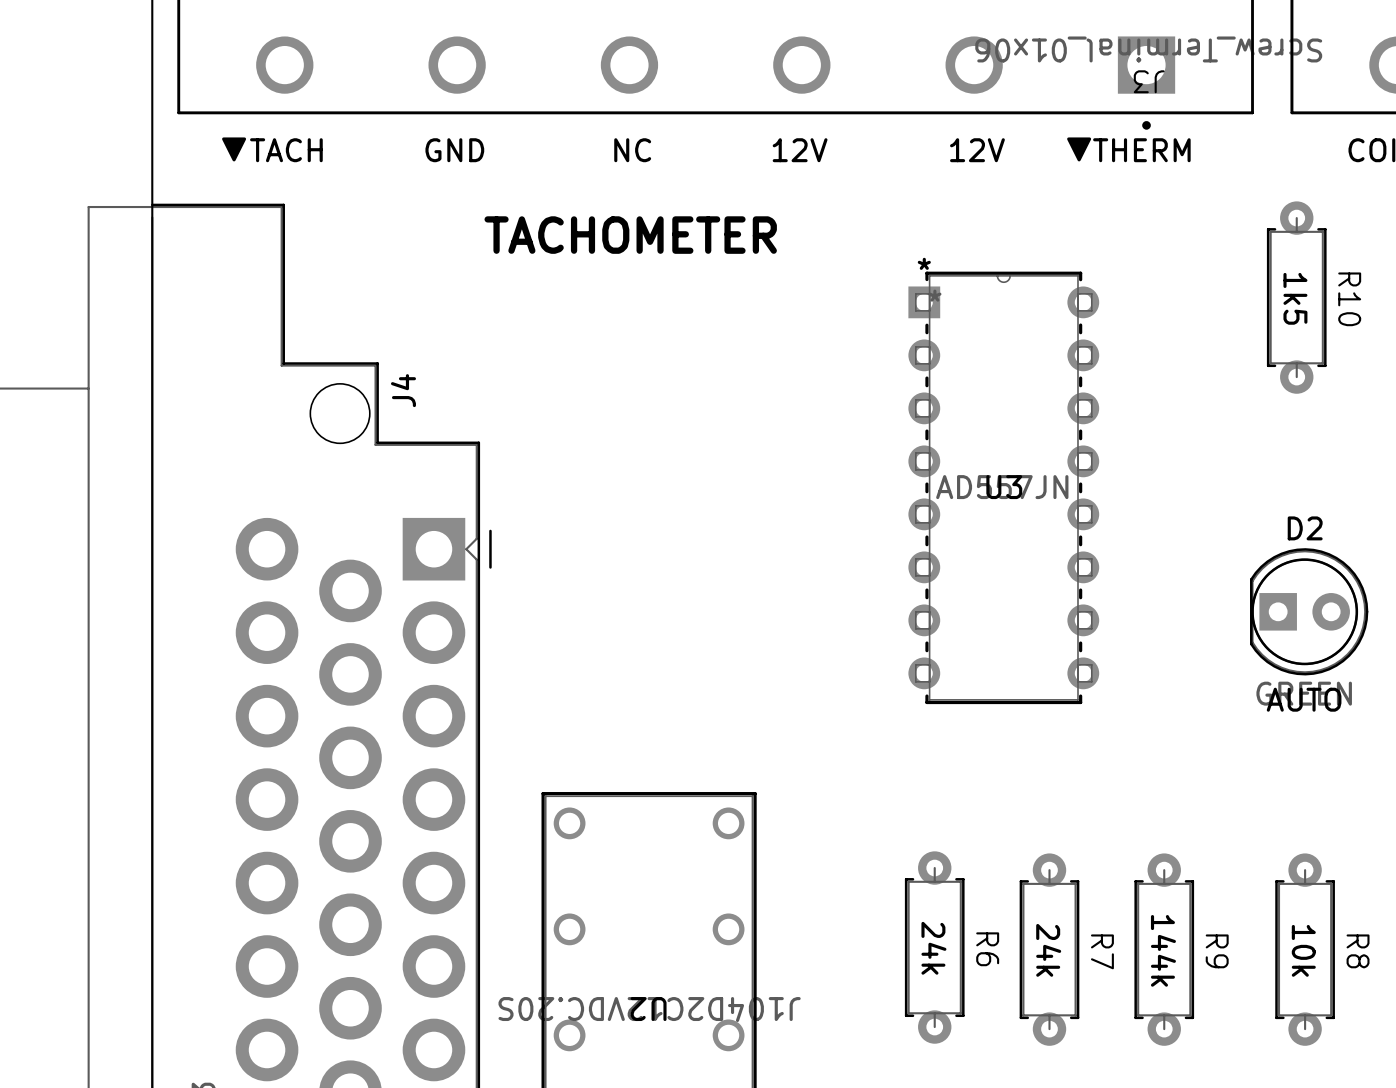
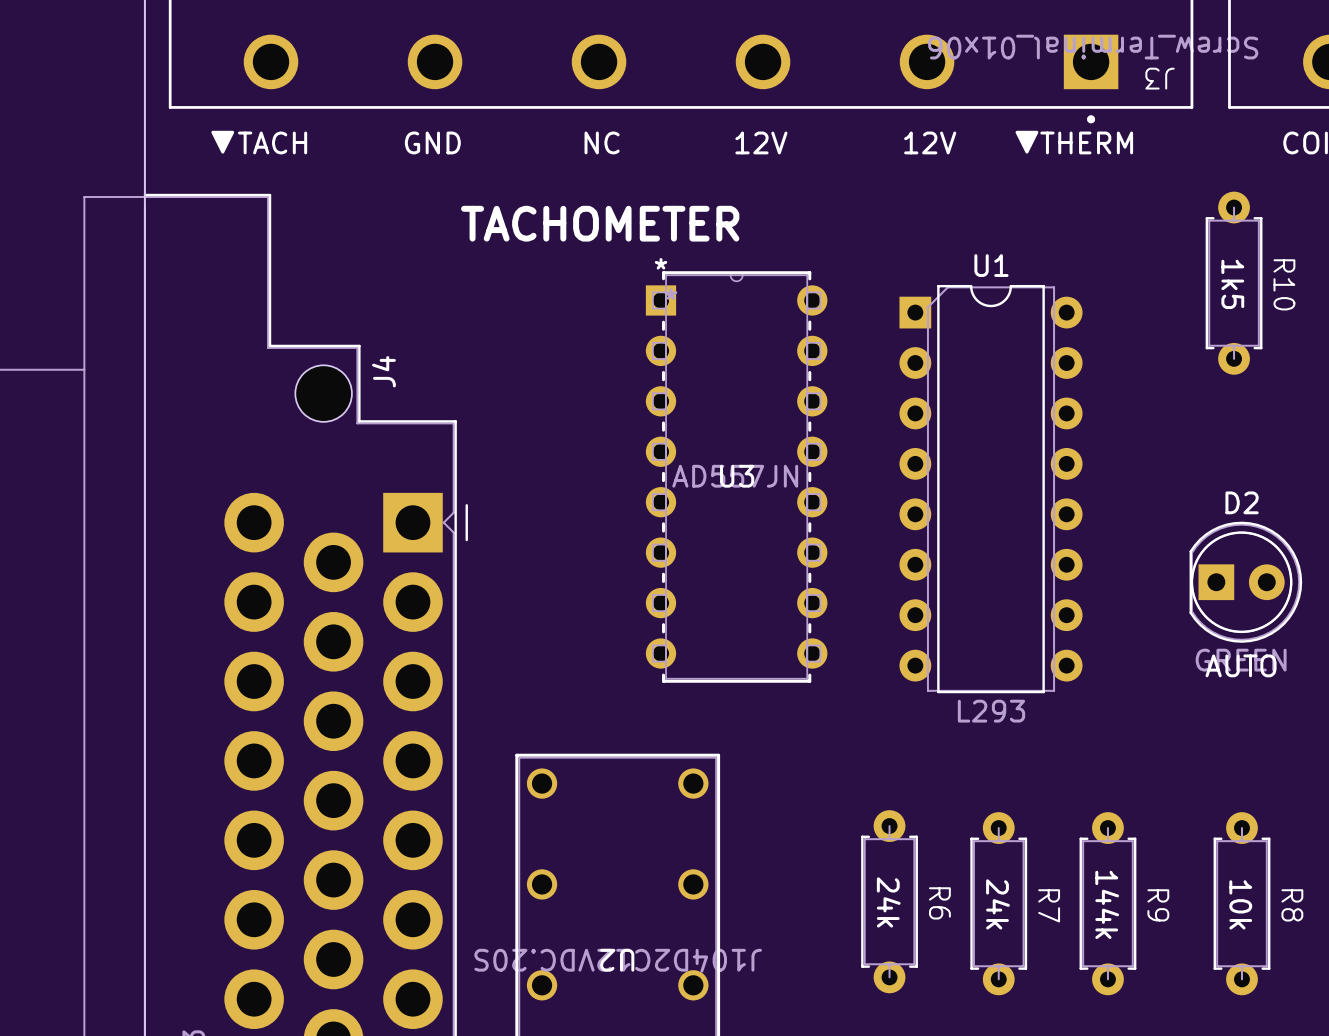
J3 name position: J3 (1149, 81) -> J3 (1160, 78)
U3 position: (1003, 487) -> (736, 476)
U1: none -> L293 (991, 489)

